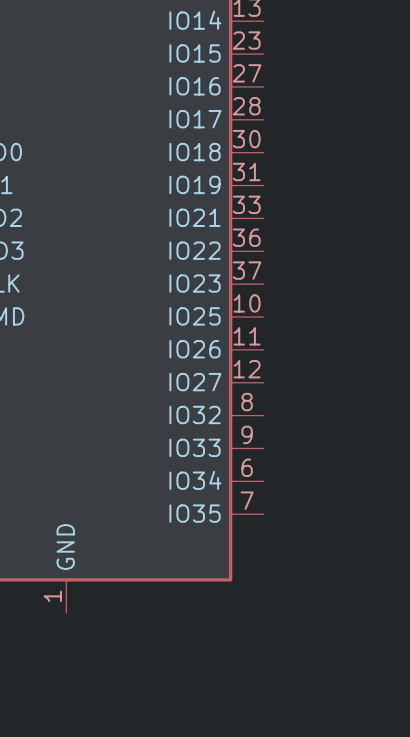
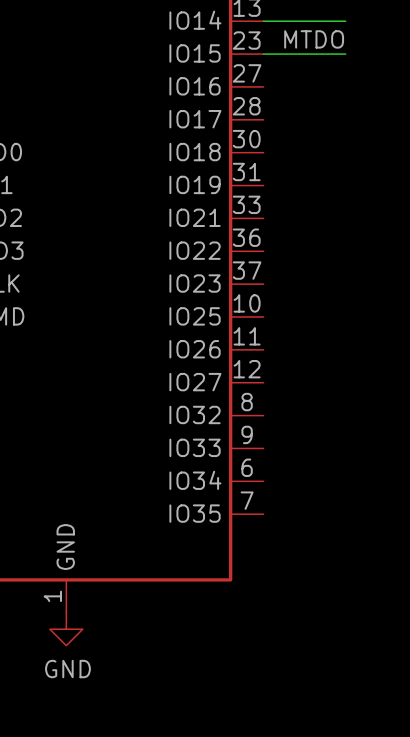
wire: none -> (263, 21) (345, 21)
label: none -> MTDO (314, 39)
wire: none -> (263, 54) (345, 54)
power symbol: none -> GND (66, 629)

